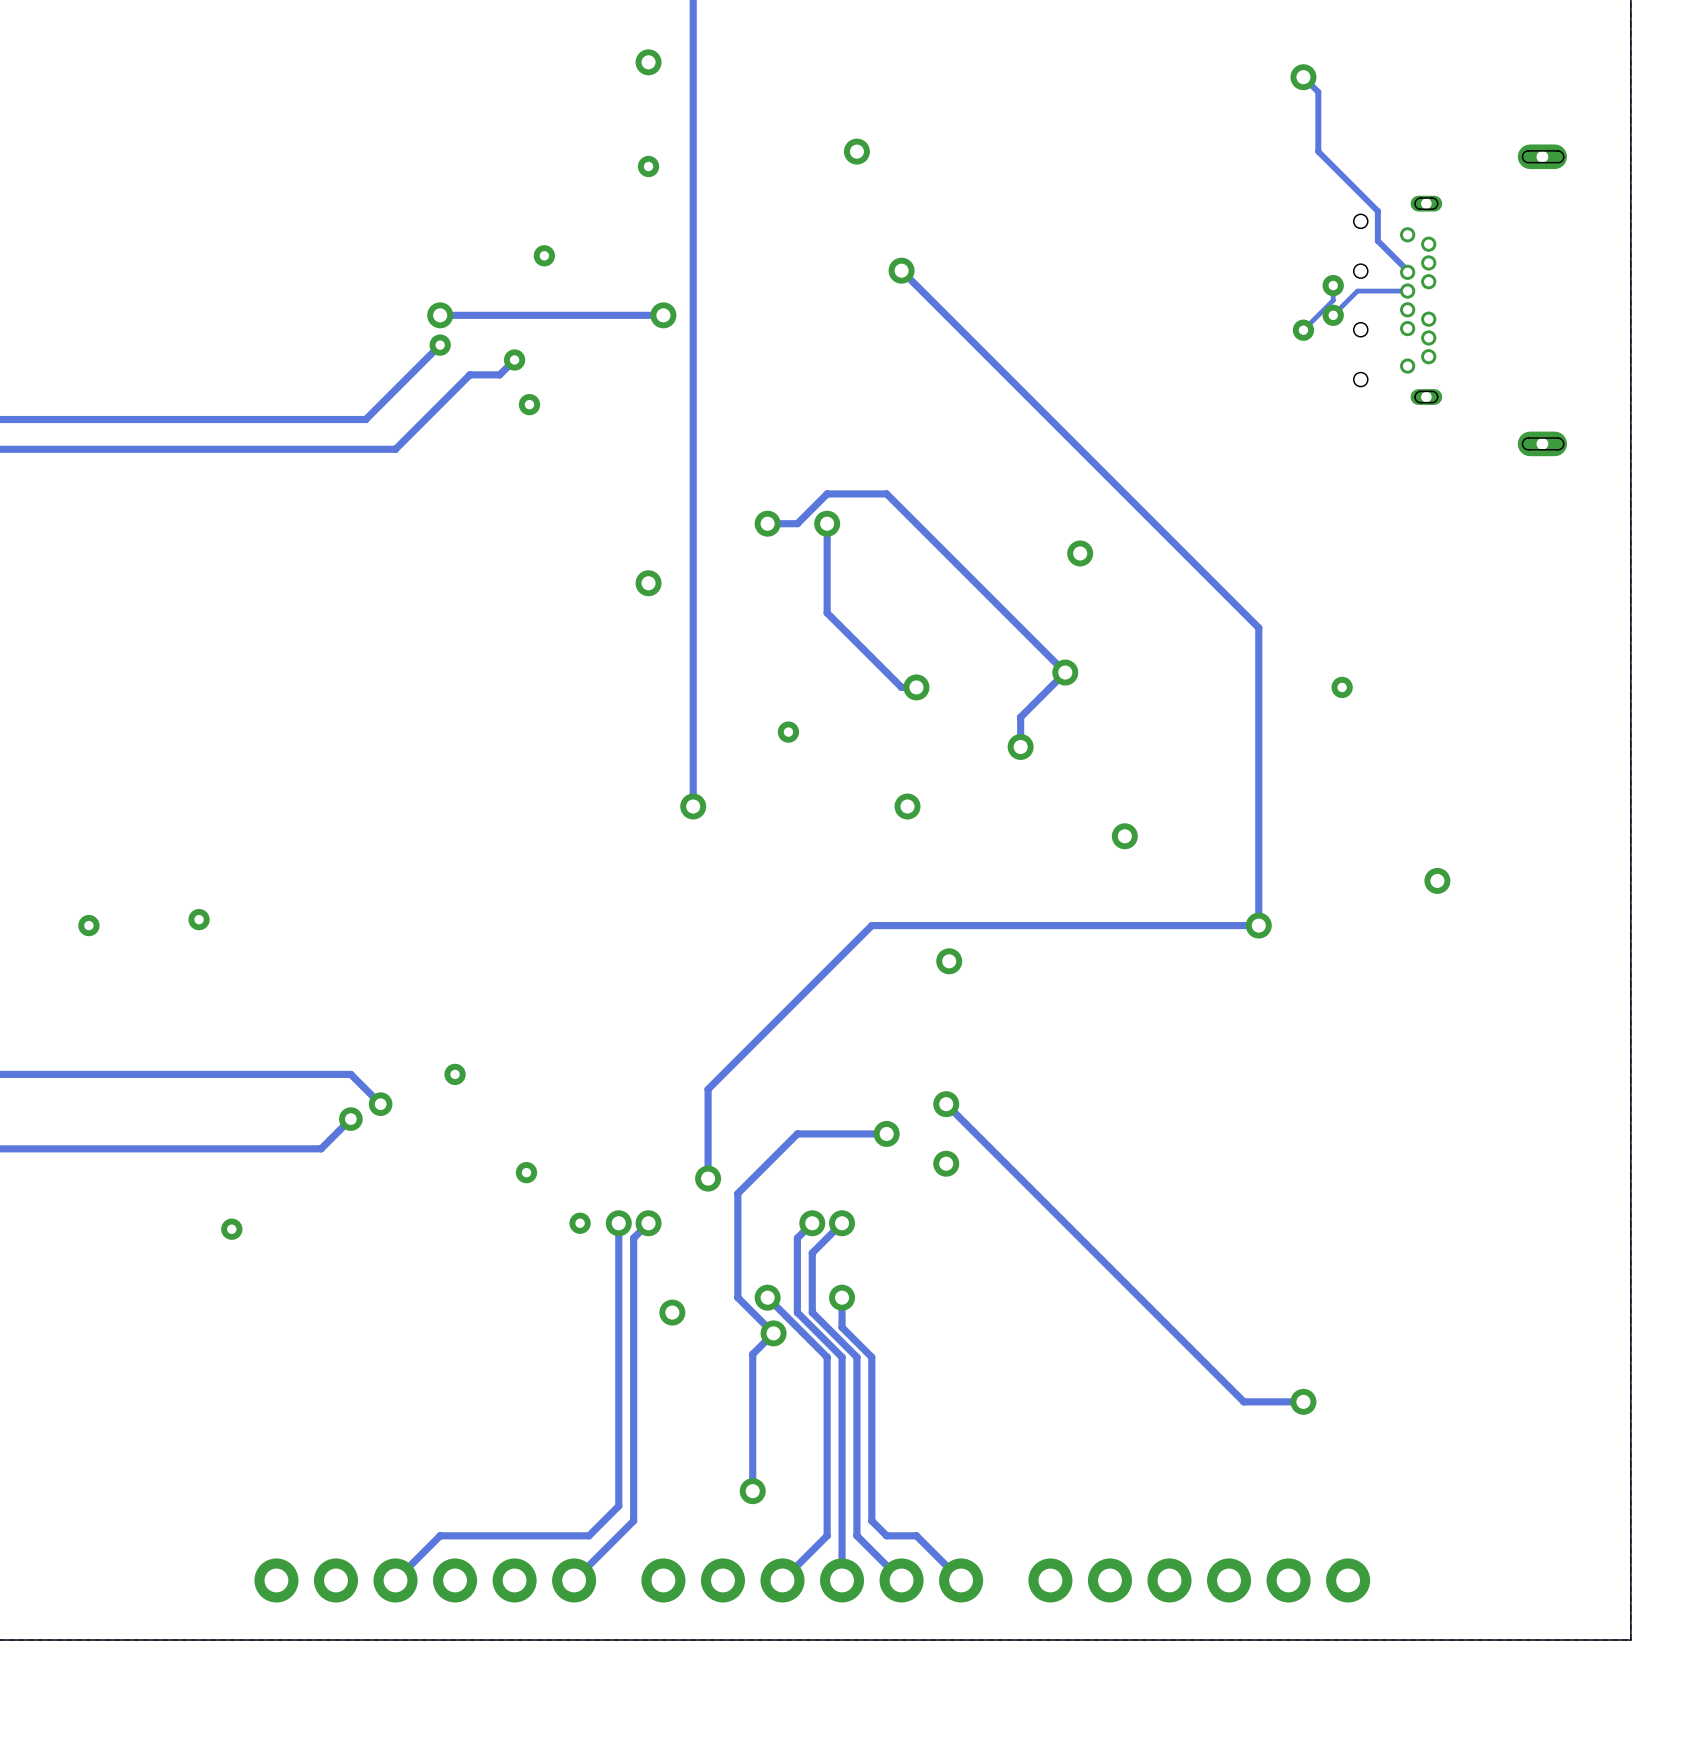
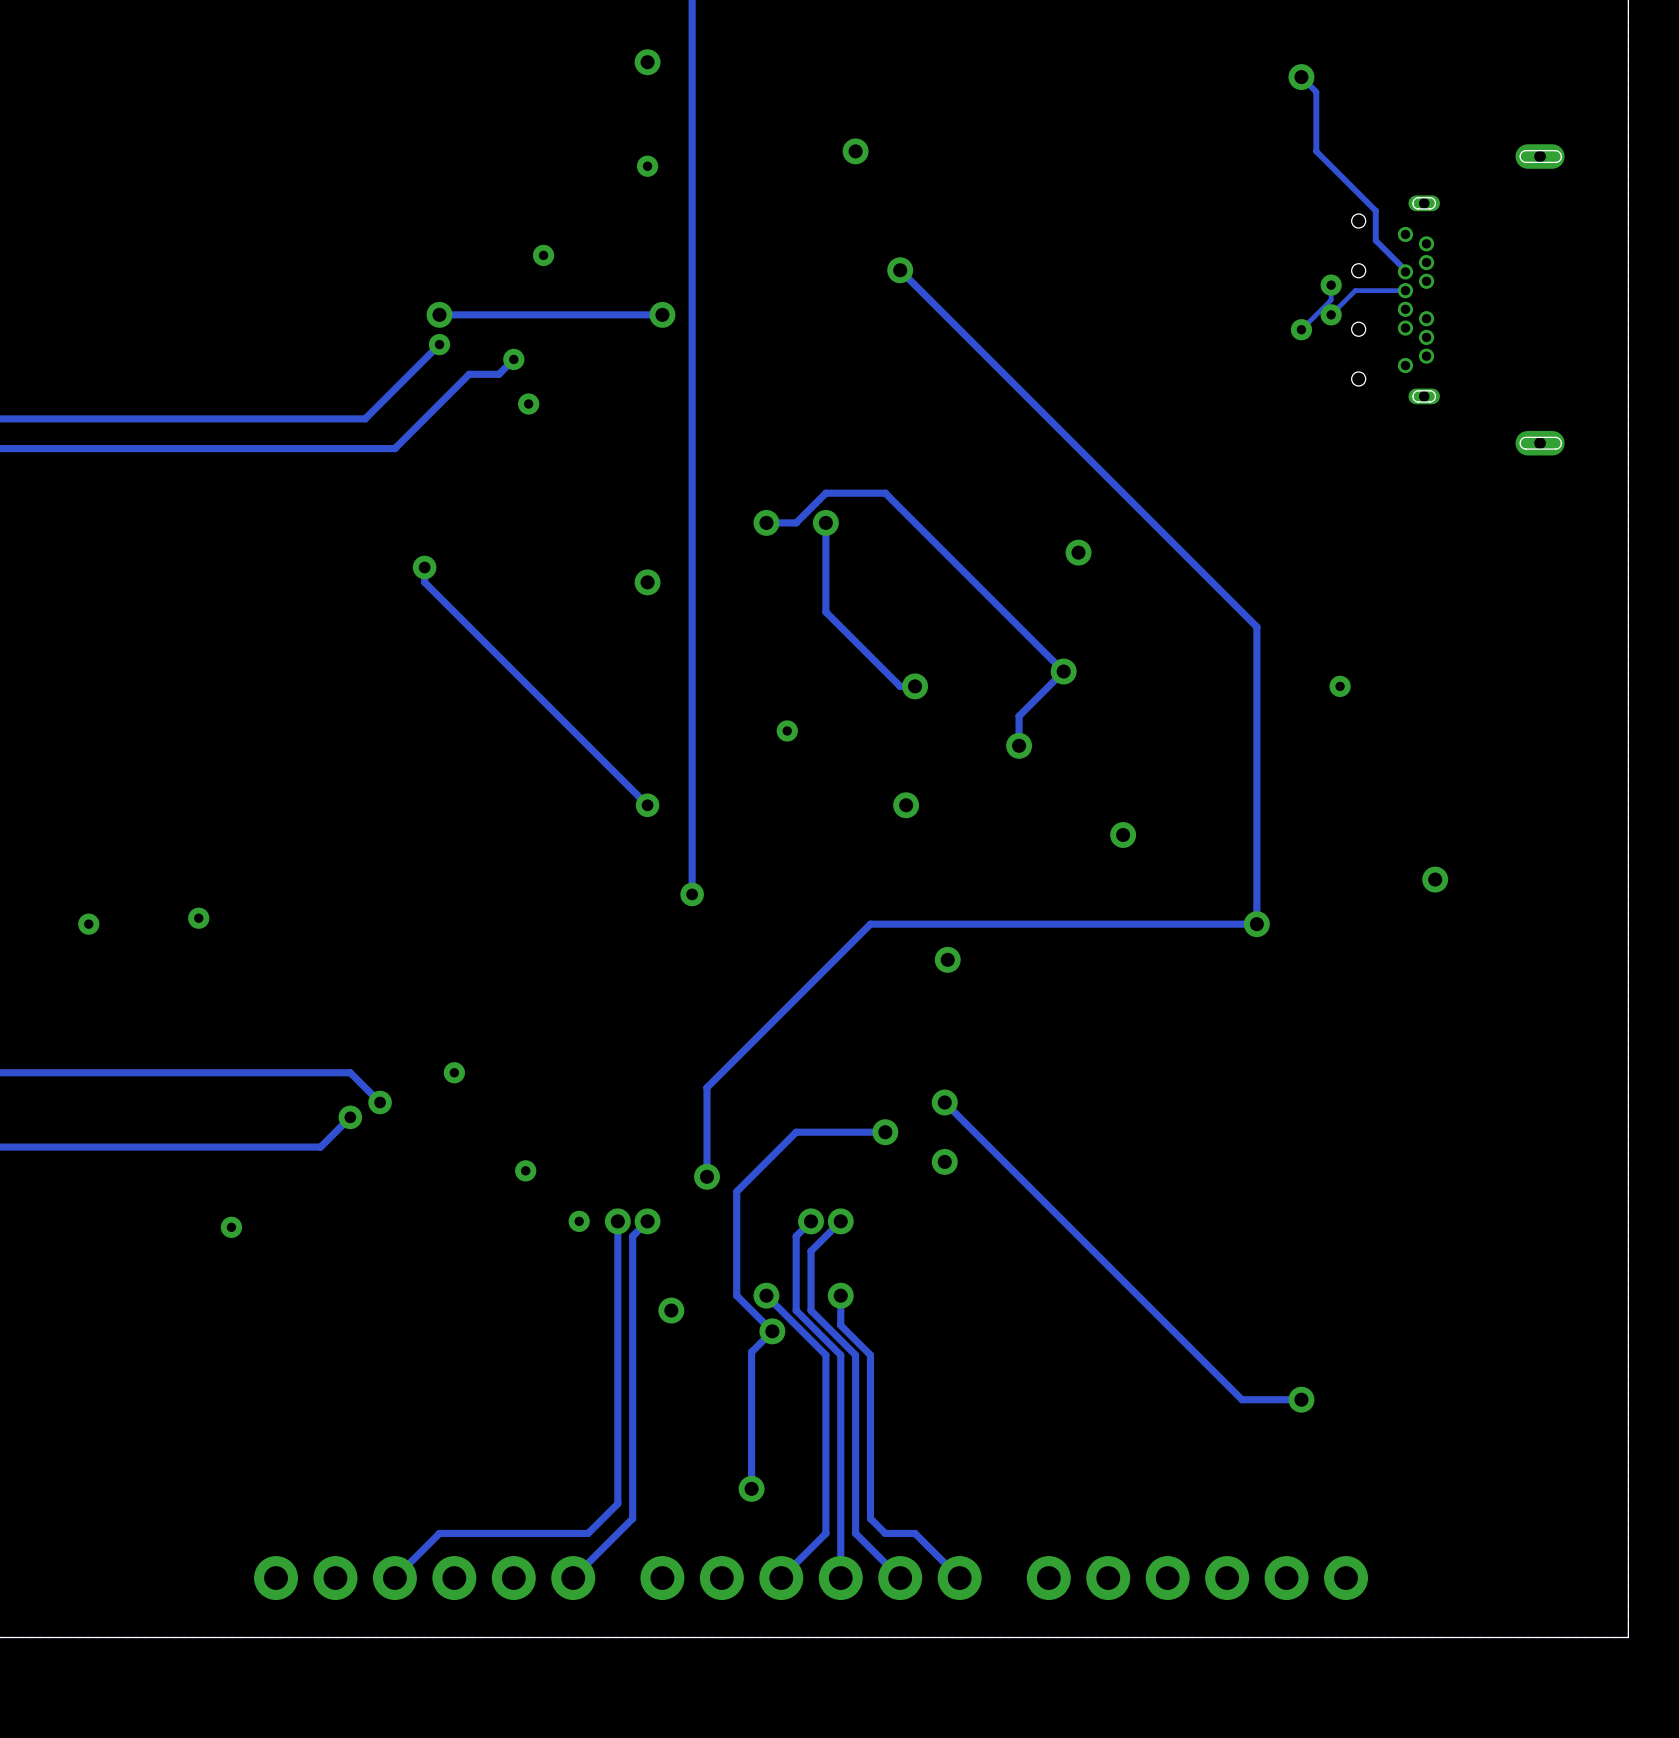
track: none -> (424, 567) (424, 582) (647, 805)
via: none -> (424, 567)
via: none -> (647, 805)
track: none -> (692, 805) (692, 894)
via: (693, 806) -> none
via: none -> (692, 894)

